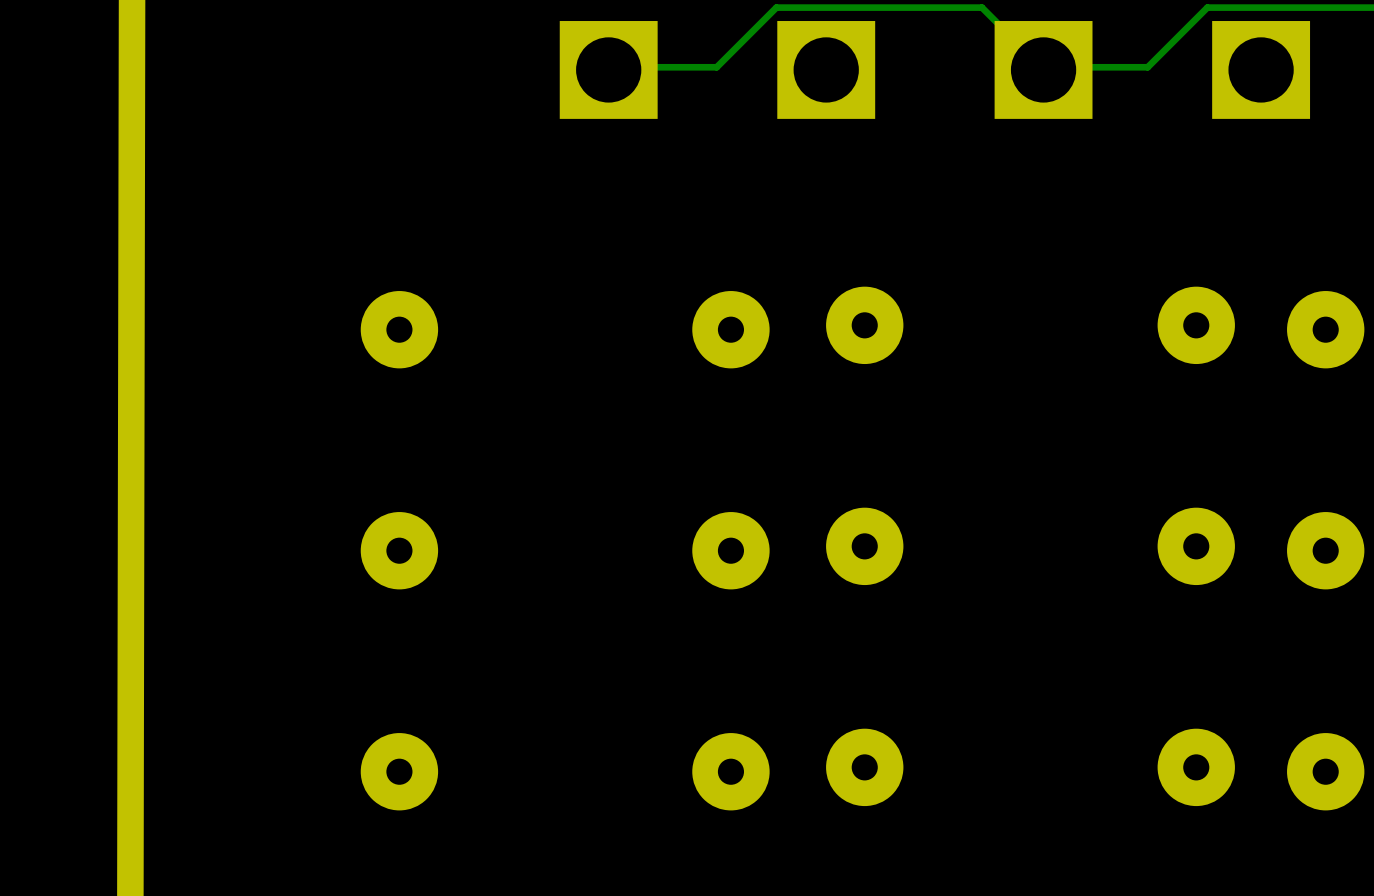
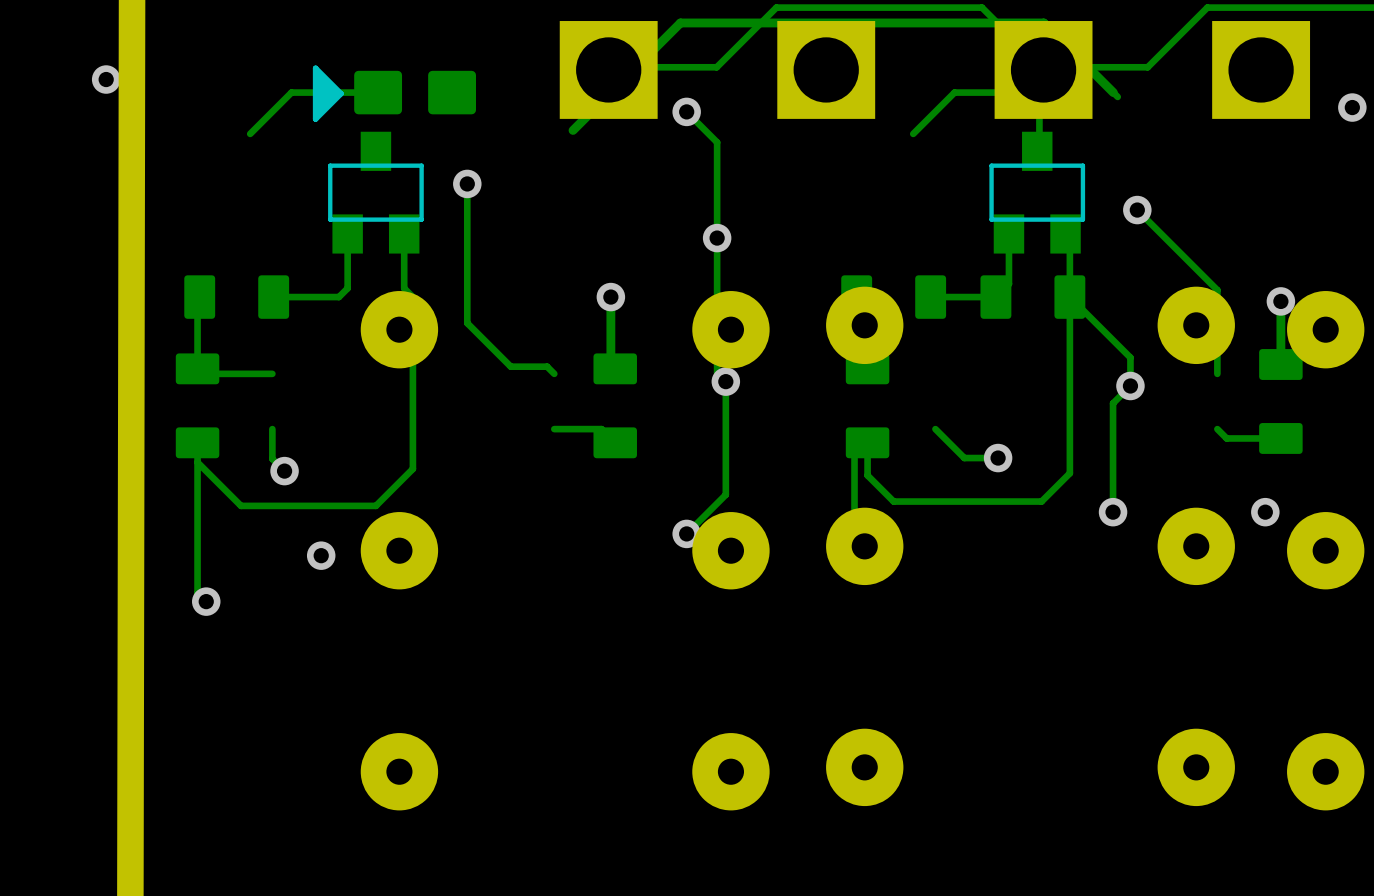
via: none -> (106, 79)
track: none -> (378, 92) (291, 92) (250, 133)
part: none -> (394, 93)
track: none -> (1117, 96) (1043, 22) (680, 22) (573, 130)
via: none -> (1352, 107)
track: none -> (686, 111) (717, 142) (717, 372) (725, 381) (725, 494) (686, 533)
via: none -> (686, 111)
track: none -> (913, 133) (954, 92) (1039, 92) (1039, 149) (1037, 151)
track: none -> (467, 183) (467, 323) (510, 366) (547, 366) (554, 373)
via: none -> (467, 183)
part: none -> (375, 192)
part: none -> (1037, 192)
track: none -> (1137, 210) (1217, 290) (1217, 373)
via: none -> (1137, 210)
track: none -> (347, 233) (347, 288) (338, 297) (273, 297)
track: none -> (404, 233) (404, 288) (412, 297) (412, 468) (375, 505) (241, 505) (197, 462)
track: none -> (1008, 233) (1008, 284) (995, 297) (930, 297)
track: none -> (1065, 233) (1069, 238) (1069, 473) (1041, 501) (893, 501) (867, 475) (867, 442) (854, 455) (854, 571)
via: none -> (717, 238)
track: none -> (199, 297) (197, 299) (197, 368) (202, 373) (272, 373)
part: none -> (236, 297)
track: none -> (610, 297) (610, 364) (615, 368)
via: none -> (610, 297)
part: none -> (893, 297)
part: none -> (1032, 297)
track: none -> (1069, 297) (1130, 357) (1130, 385) (1113, 403) (1113, 512)
track: none -> (1280, 301) (1280, 364)
via: none -> (1280, 301)
via: none -> (725, 381)
via: none -> (1130, 385)
part: none -> (1280, 401)
part: none -> (197, 405)
part: none -> (615, 405)
part: none -> (867, 405)
track: none -> (272, 429) (272, 458) (284, 471)
track: none -> (554, 429) (601, 429) (615, 442)
track: none -> (935, 429) (964, 458) (998, 458)
track: none -> (1217, 429) (1226, 438) (1280, 438)
track: none -> (197, 442) (197, 592) (206, 601)
via: none -> (998, 458)
via: none -> (284, 471)
via: none -> (1113, 512)
via: none -> (1265, 512)
via: none -> (686, 533)
via: none -> (321, 555)
via: none -> (206, 601)

